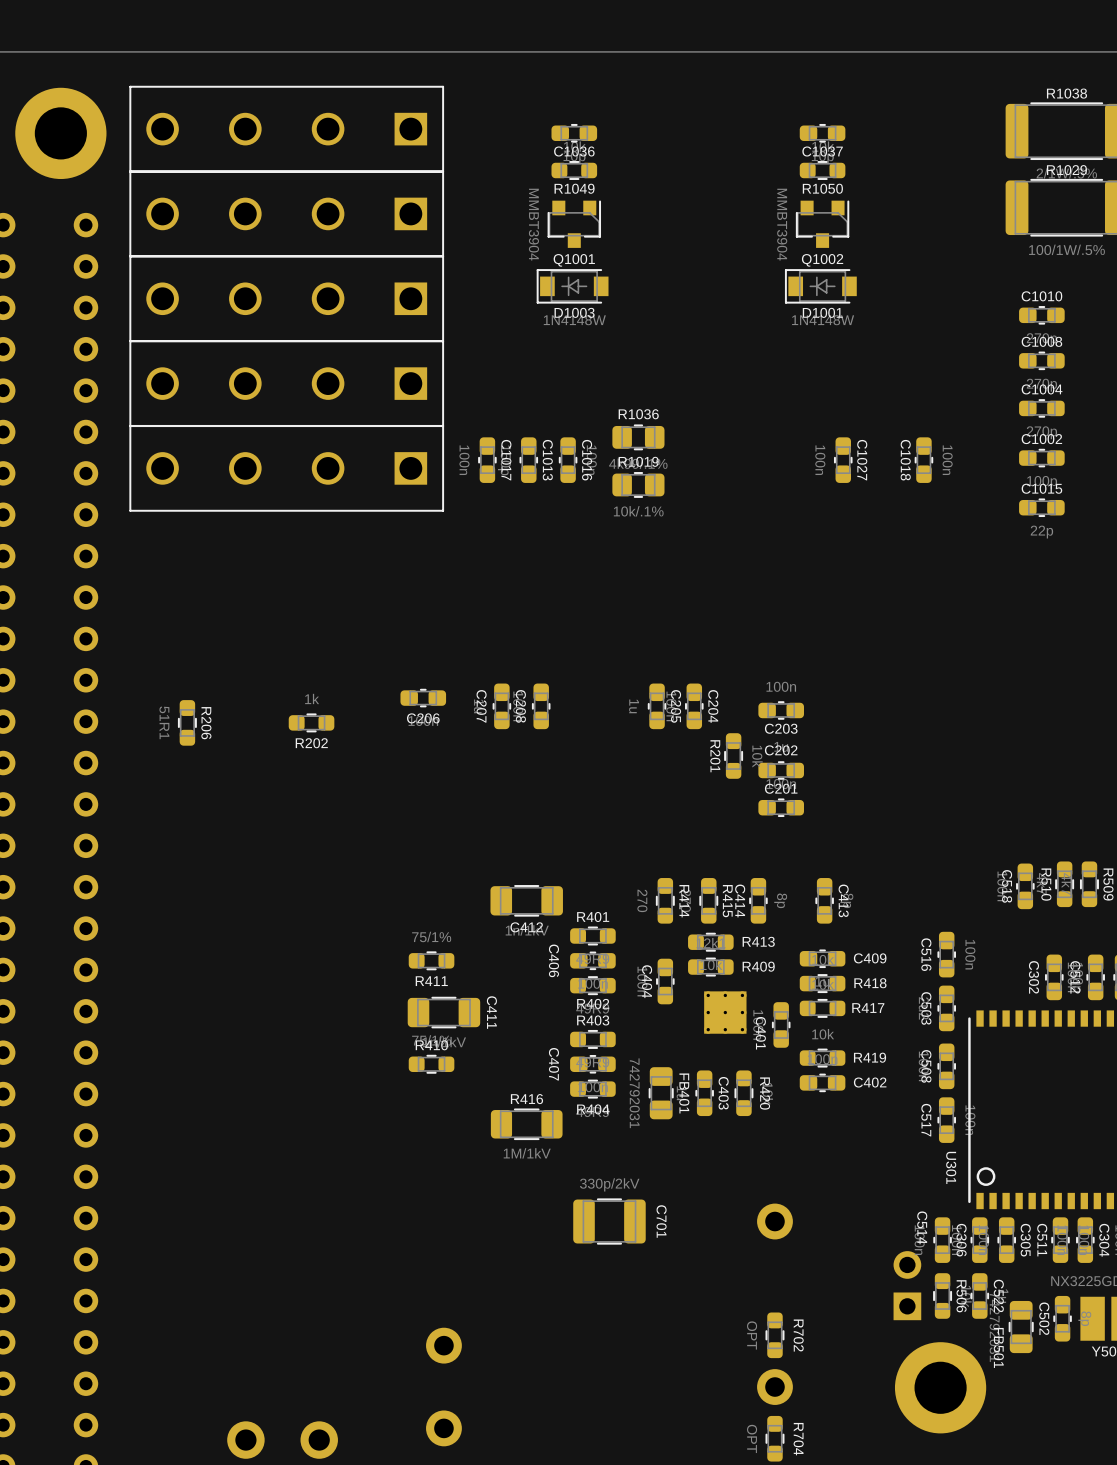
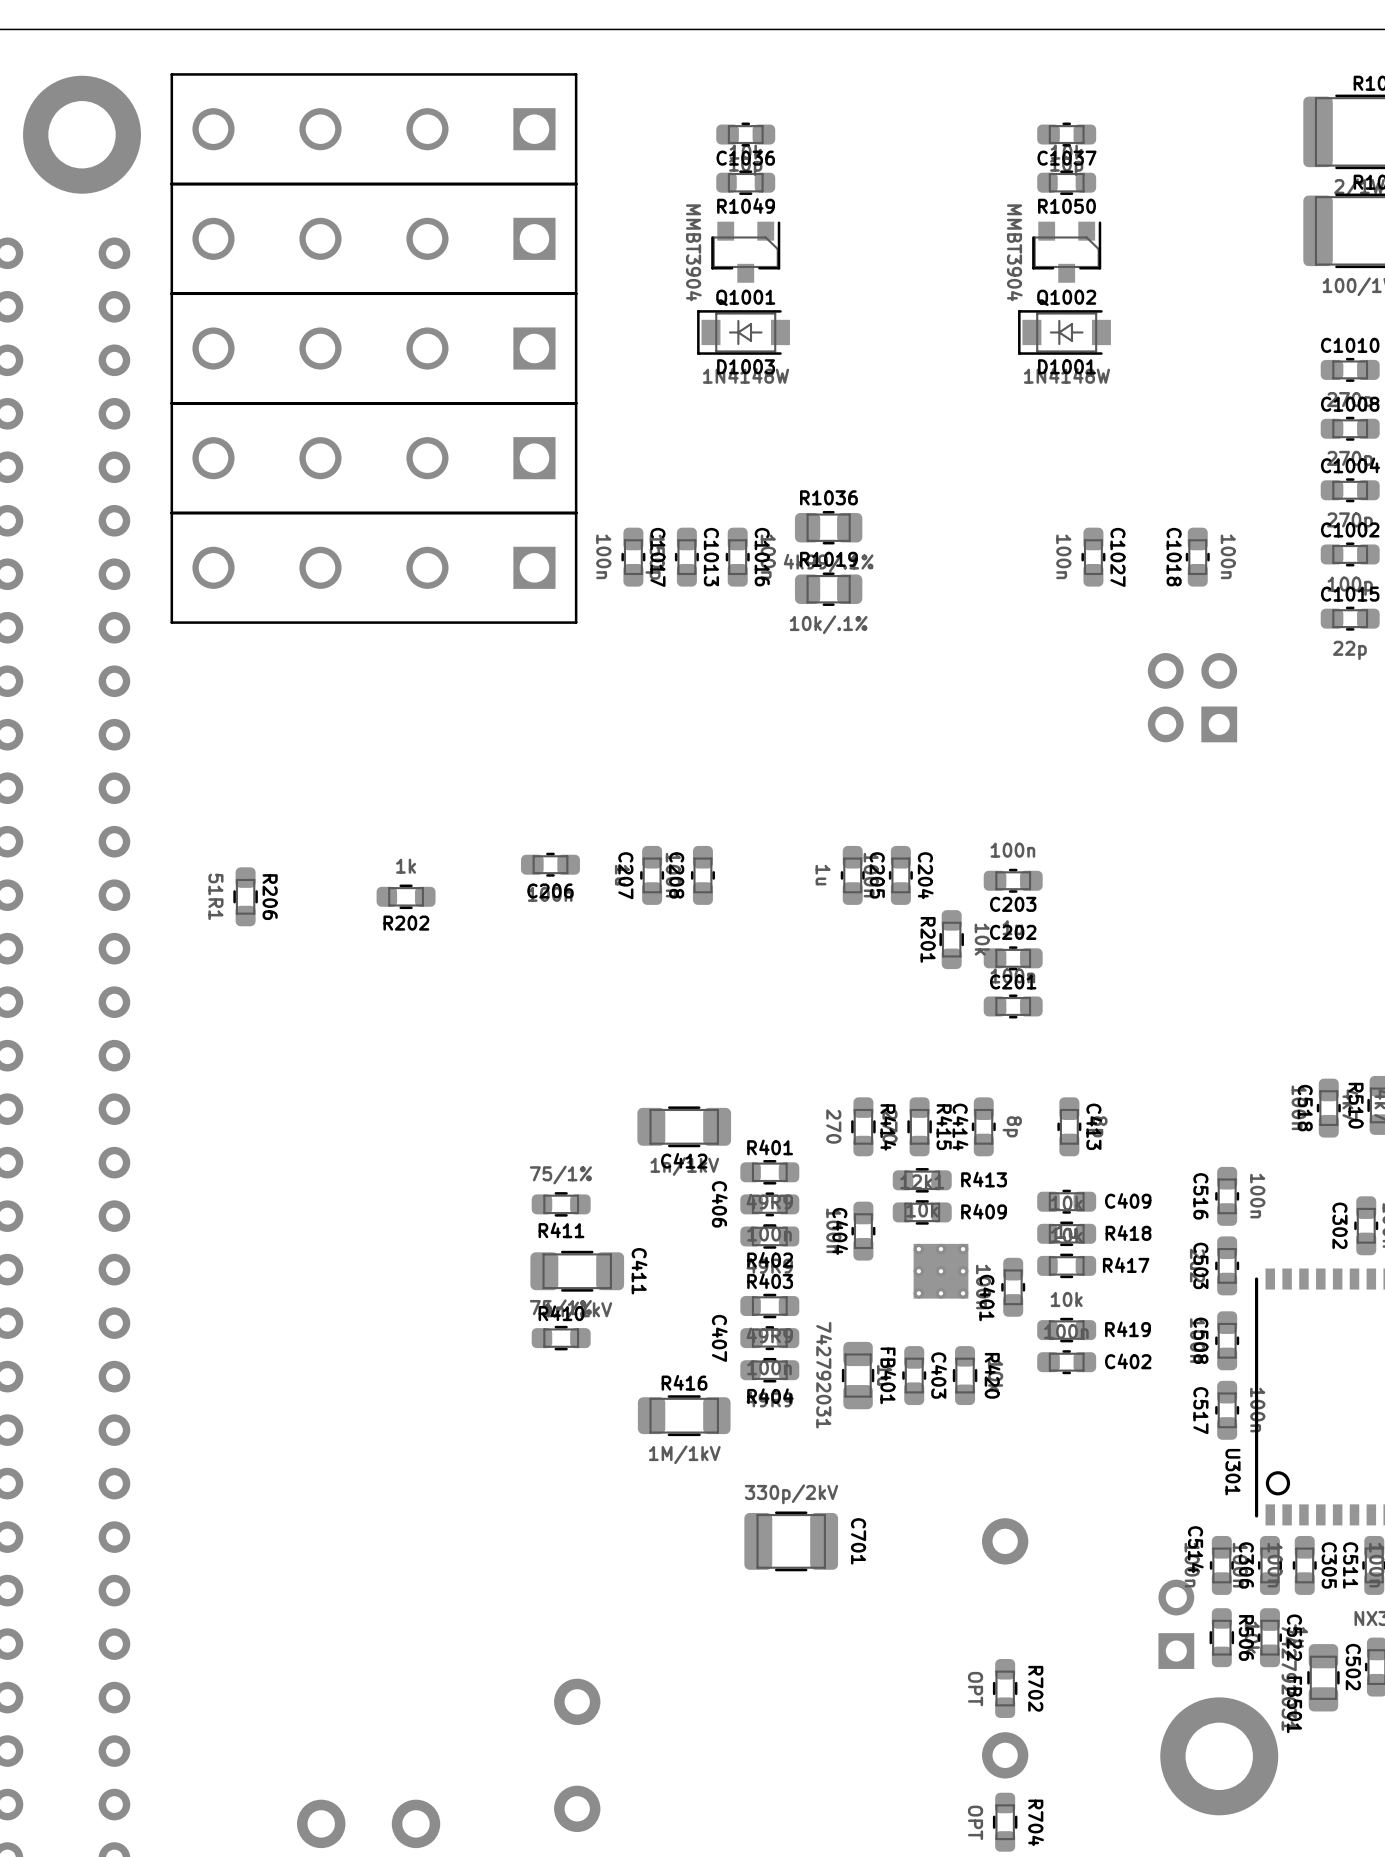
part: none -> (1192, 697)

